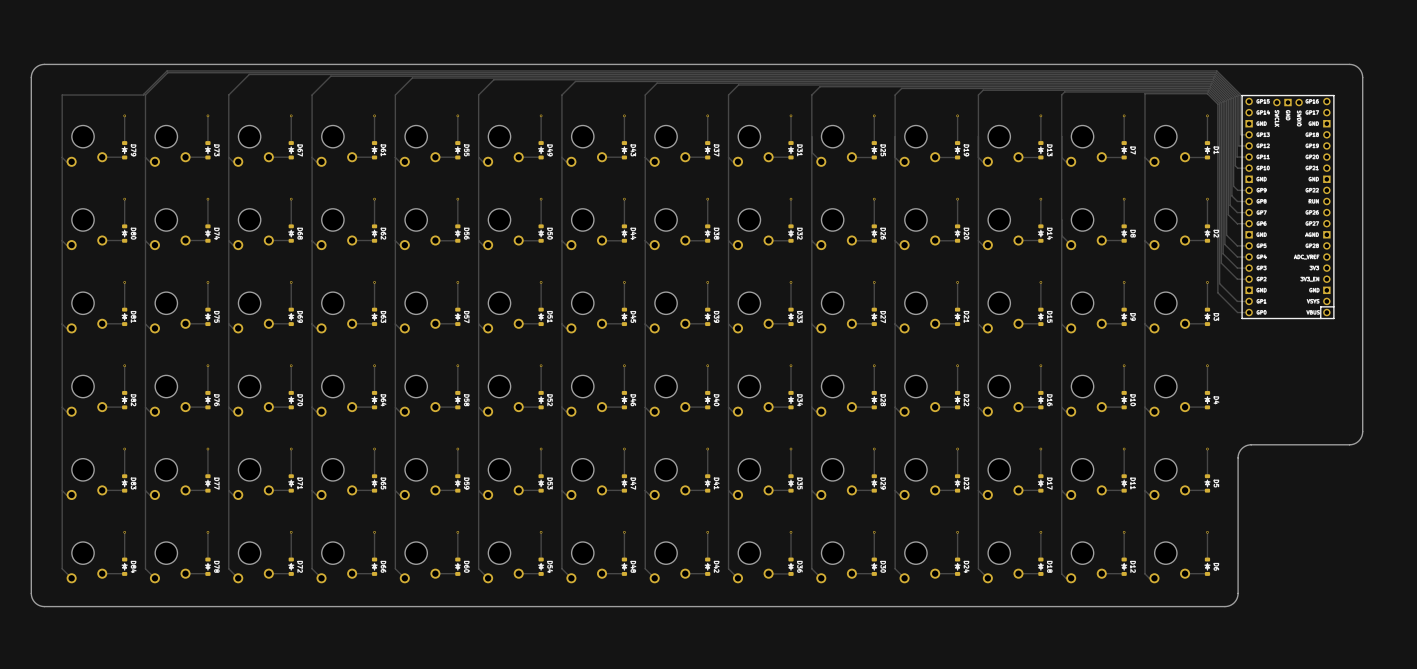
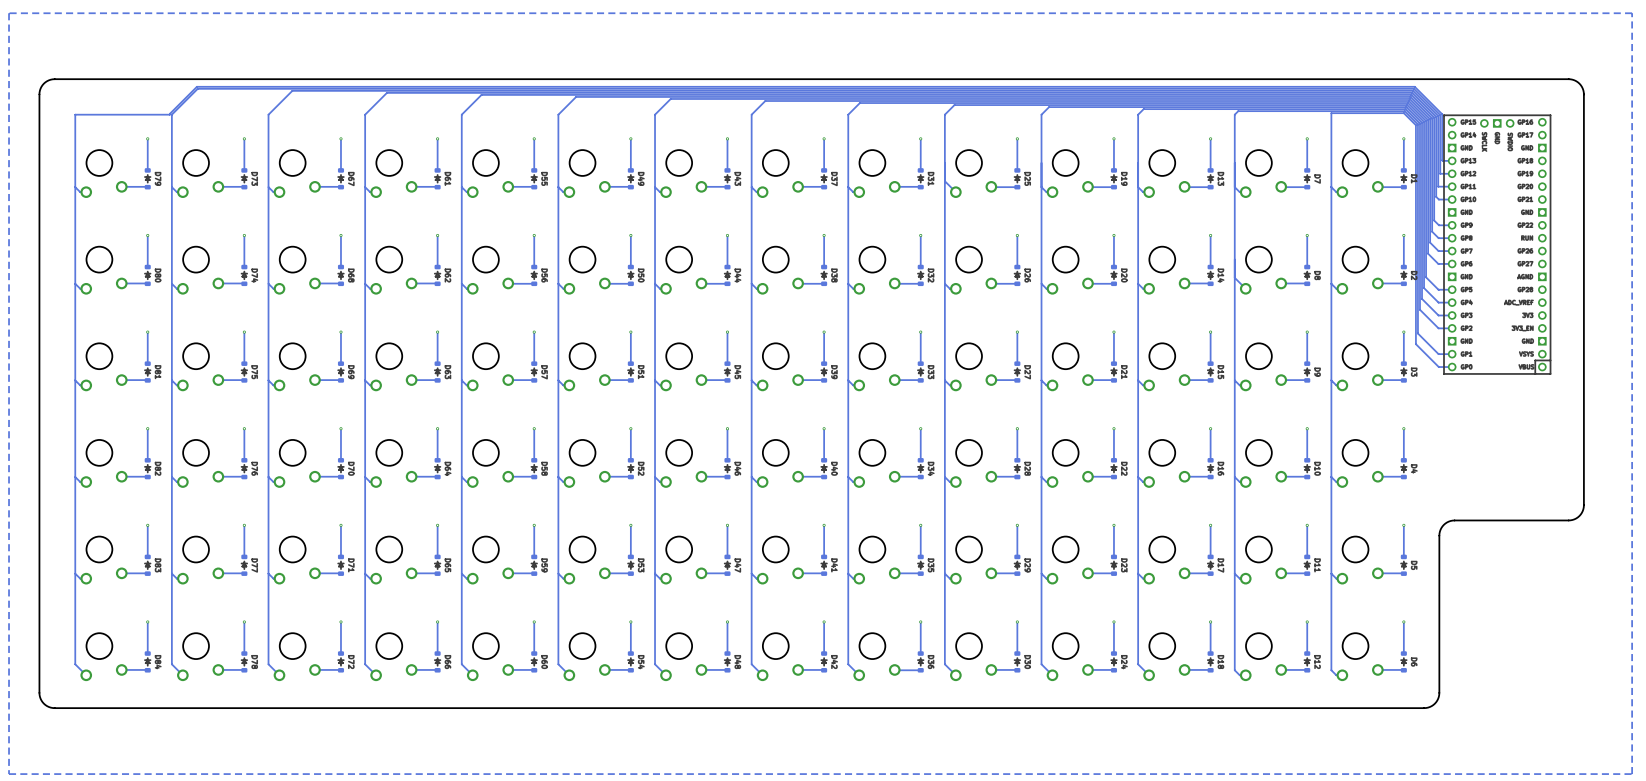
zone outline: none -> (1632, 13) (9, 13) (9, 774) (1632, 774) (1632, 13)

